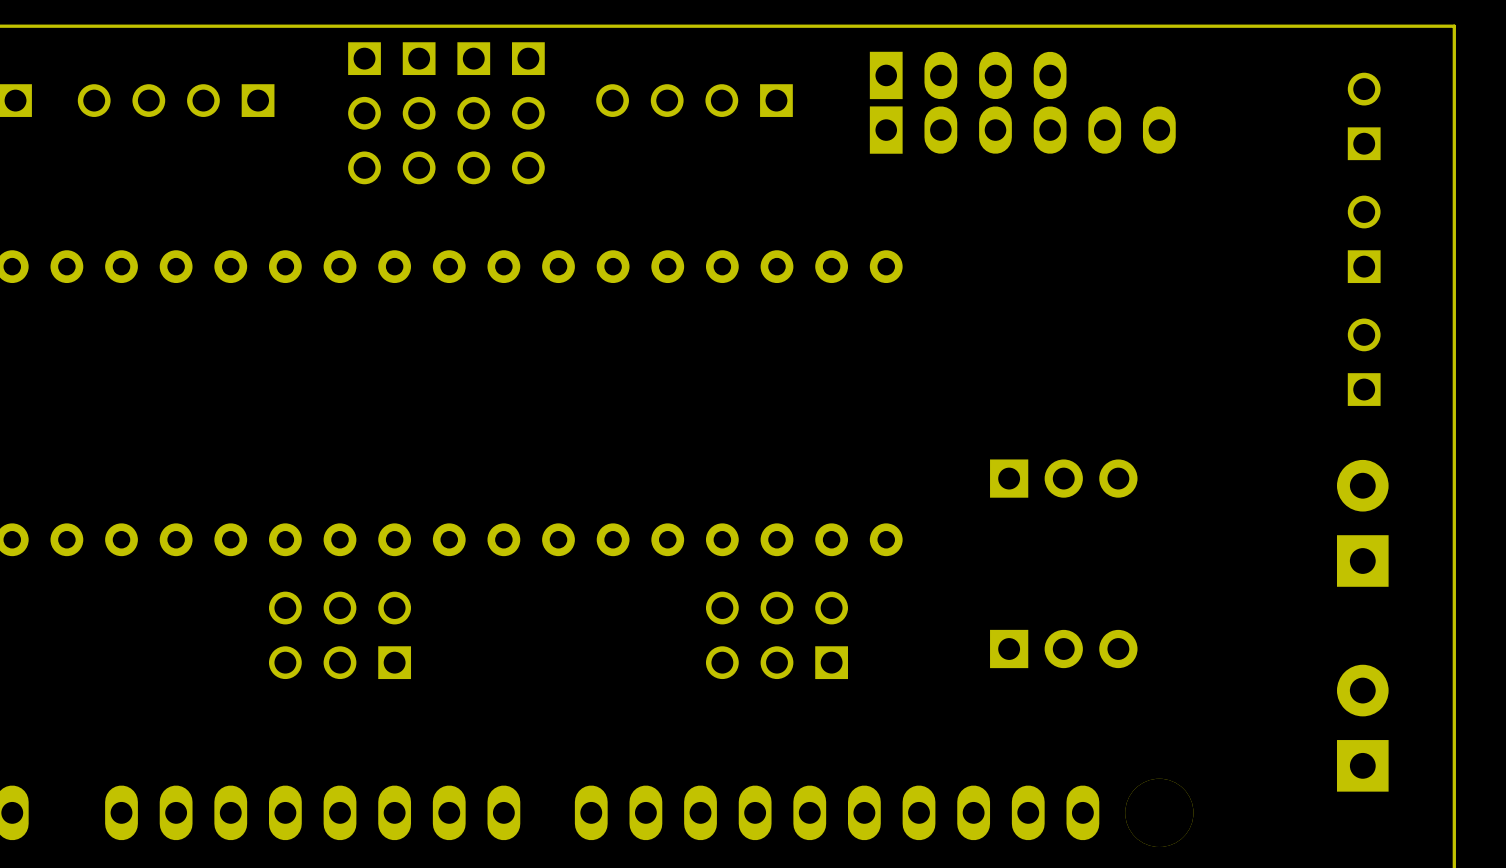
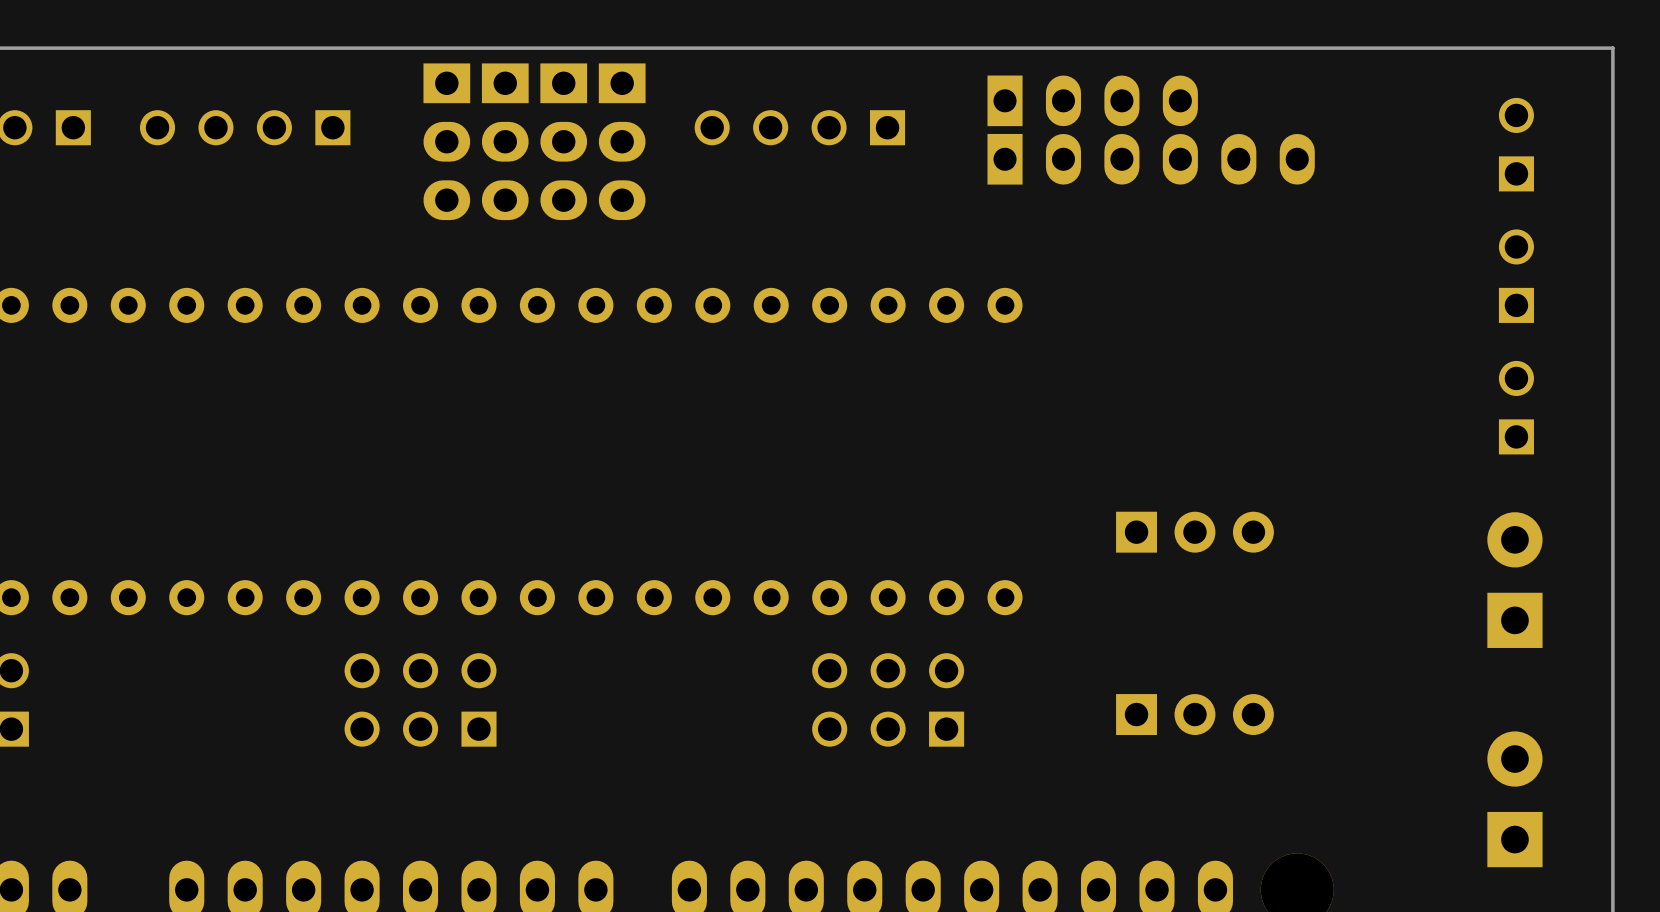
part footprint: [348, 42, 381, 185] -> [423, 63, 471, 221]
part footprint: [402, 42, 436, 185] -> [481, 63, 529, 221]
part footprint: [457, 42, 491, 185] -> [540, 63, 588, 221]
part footprint: [512, 42, 545, 185] -> [598, 63, 646, 221]

